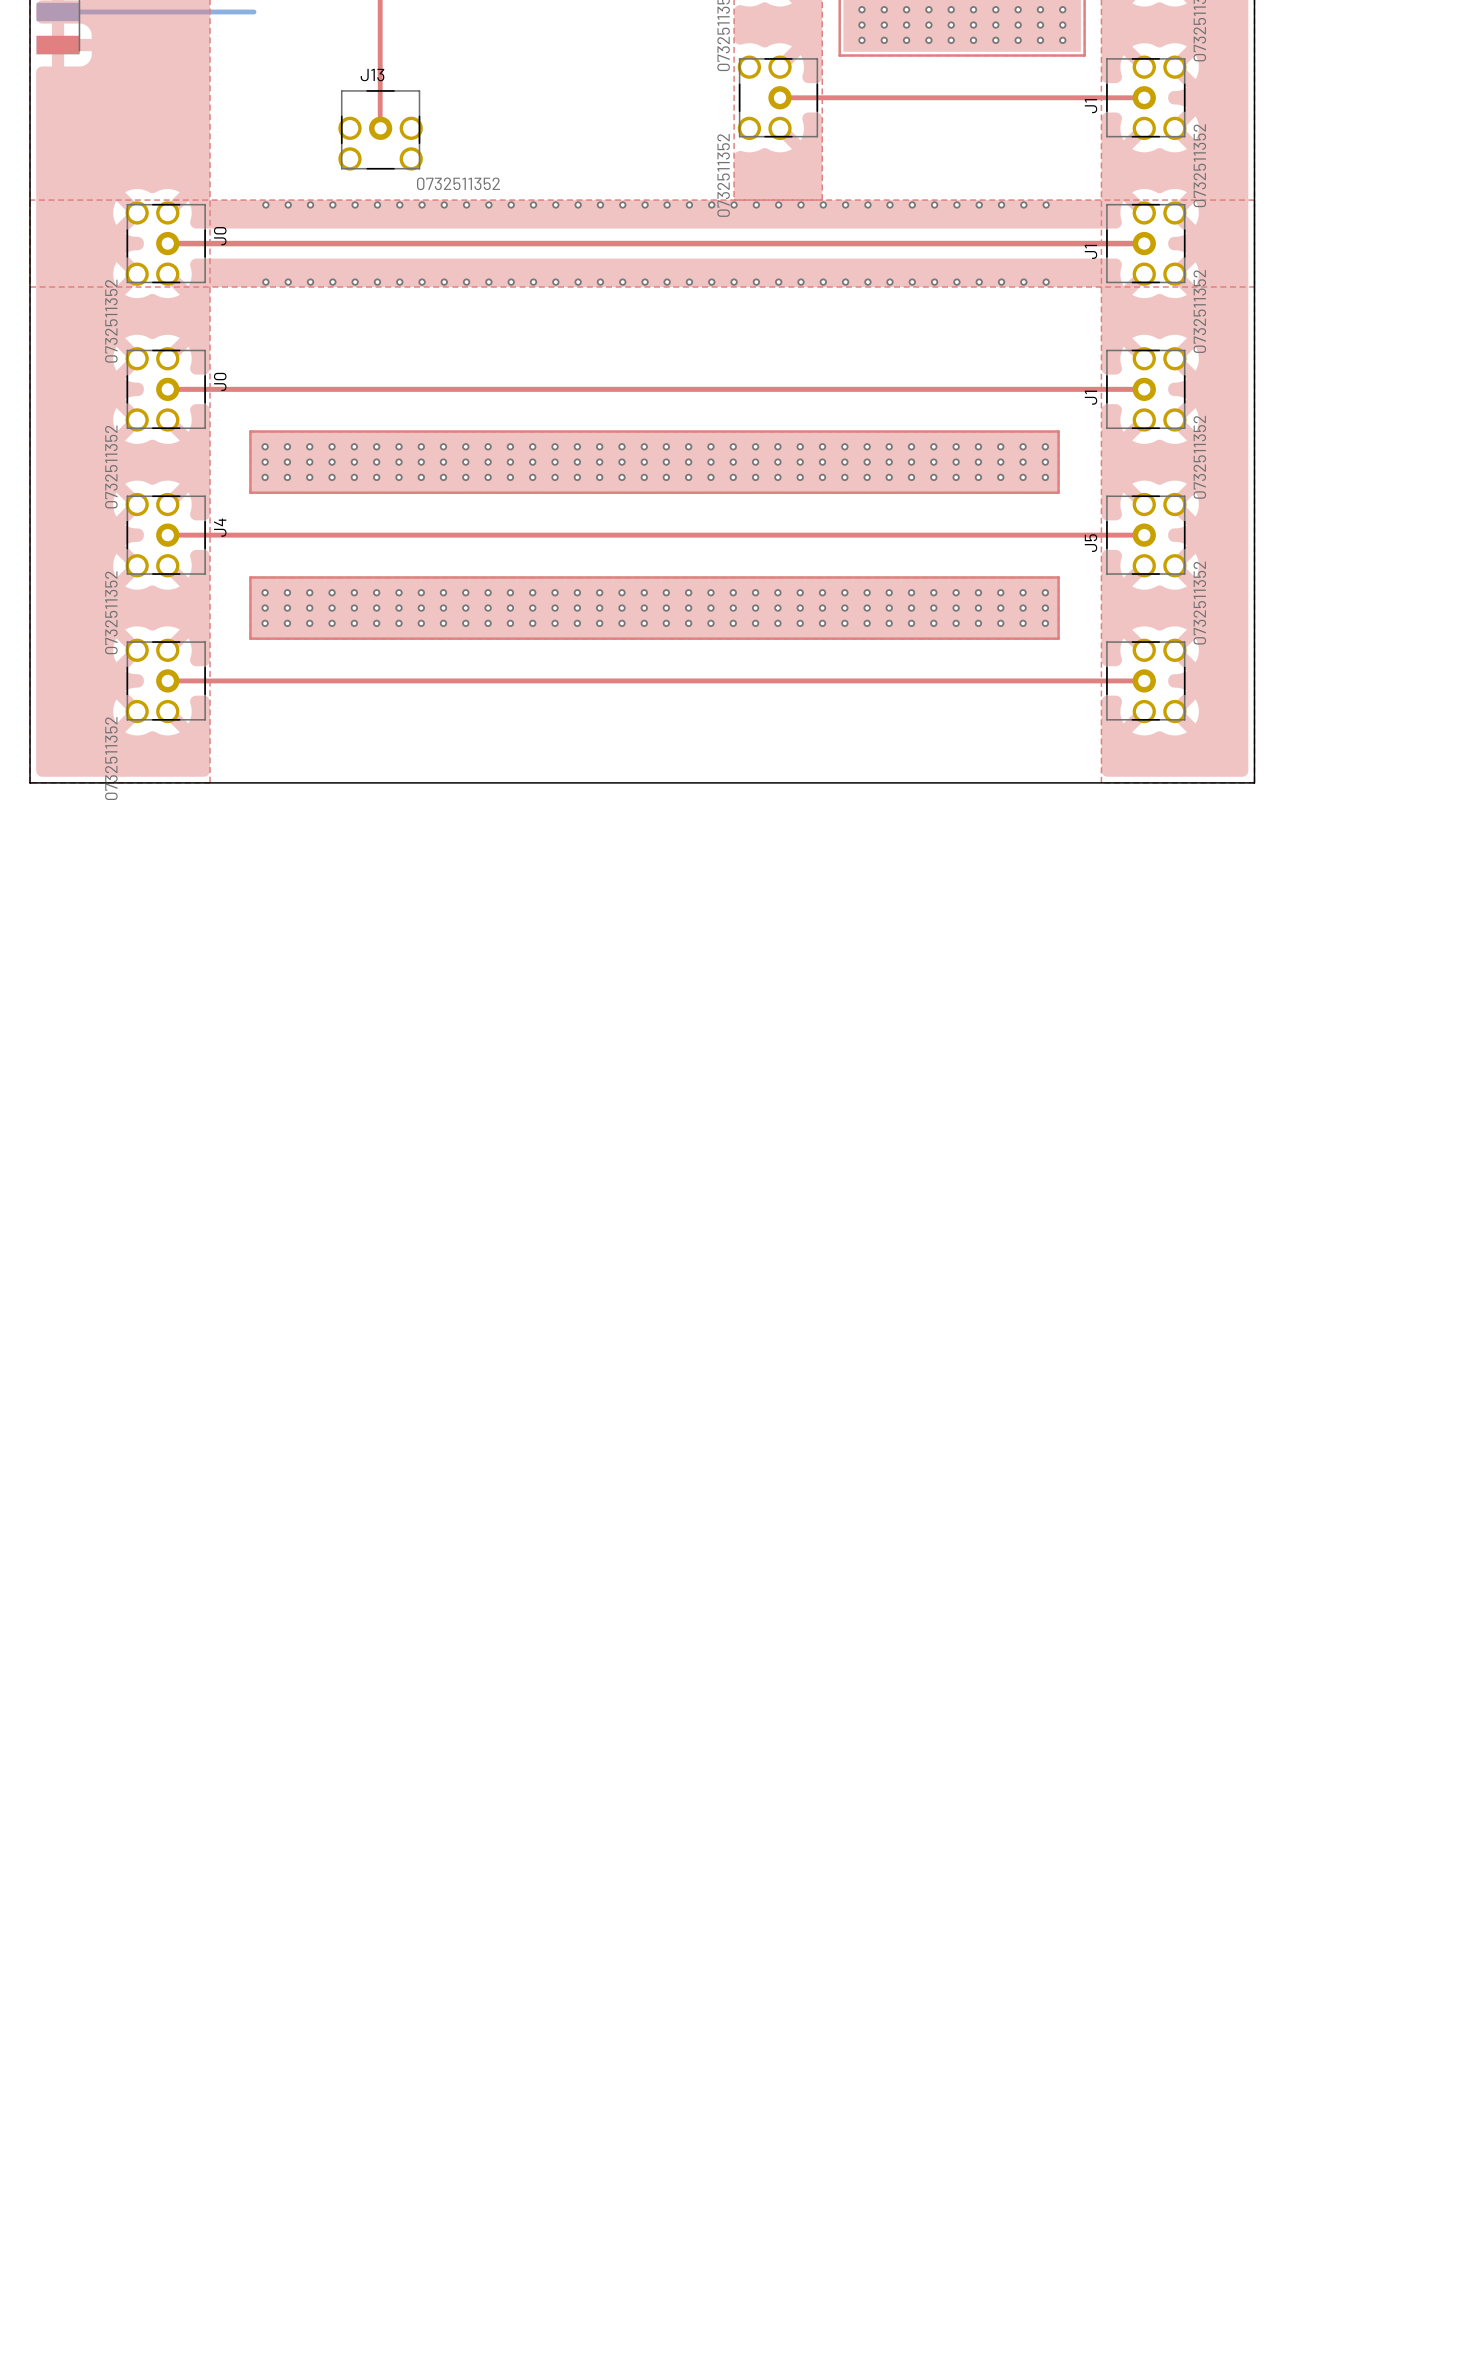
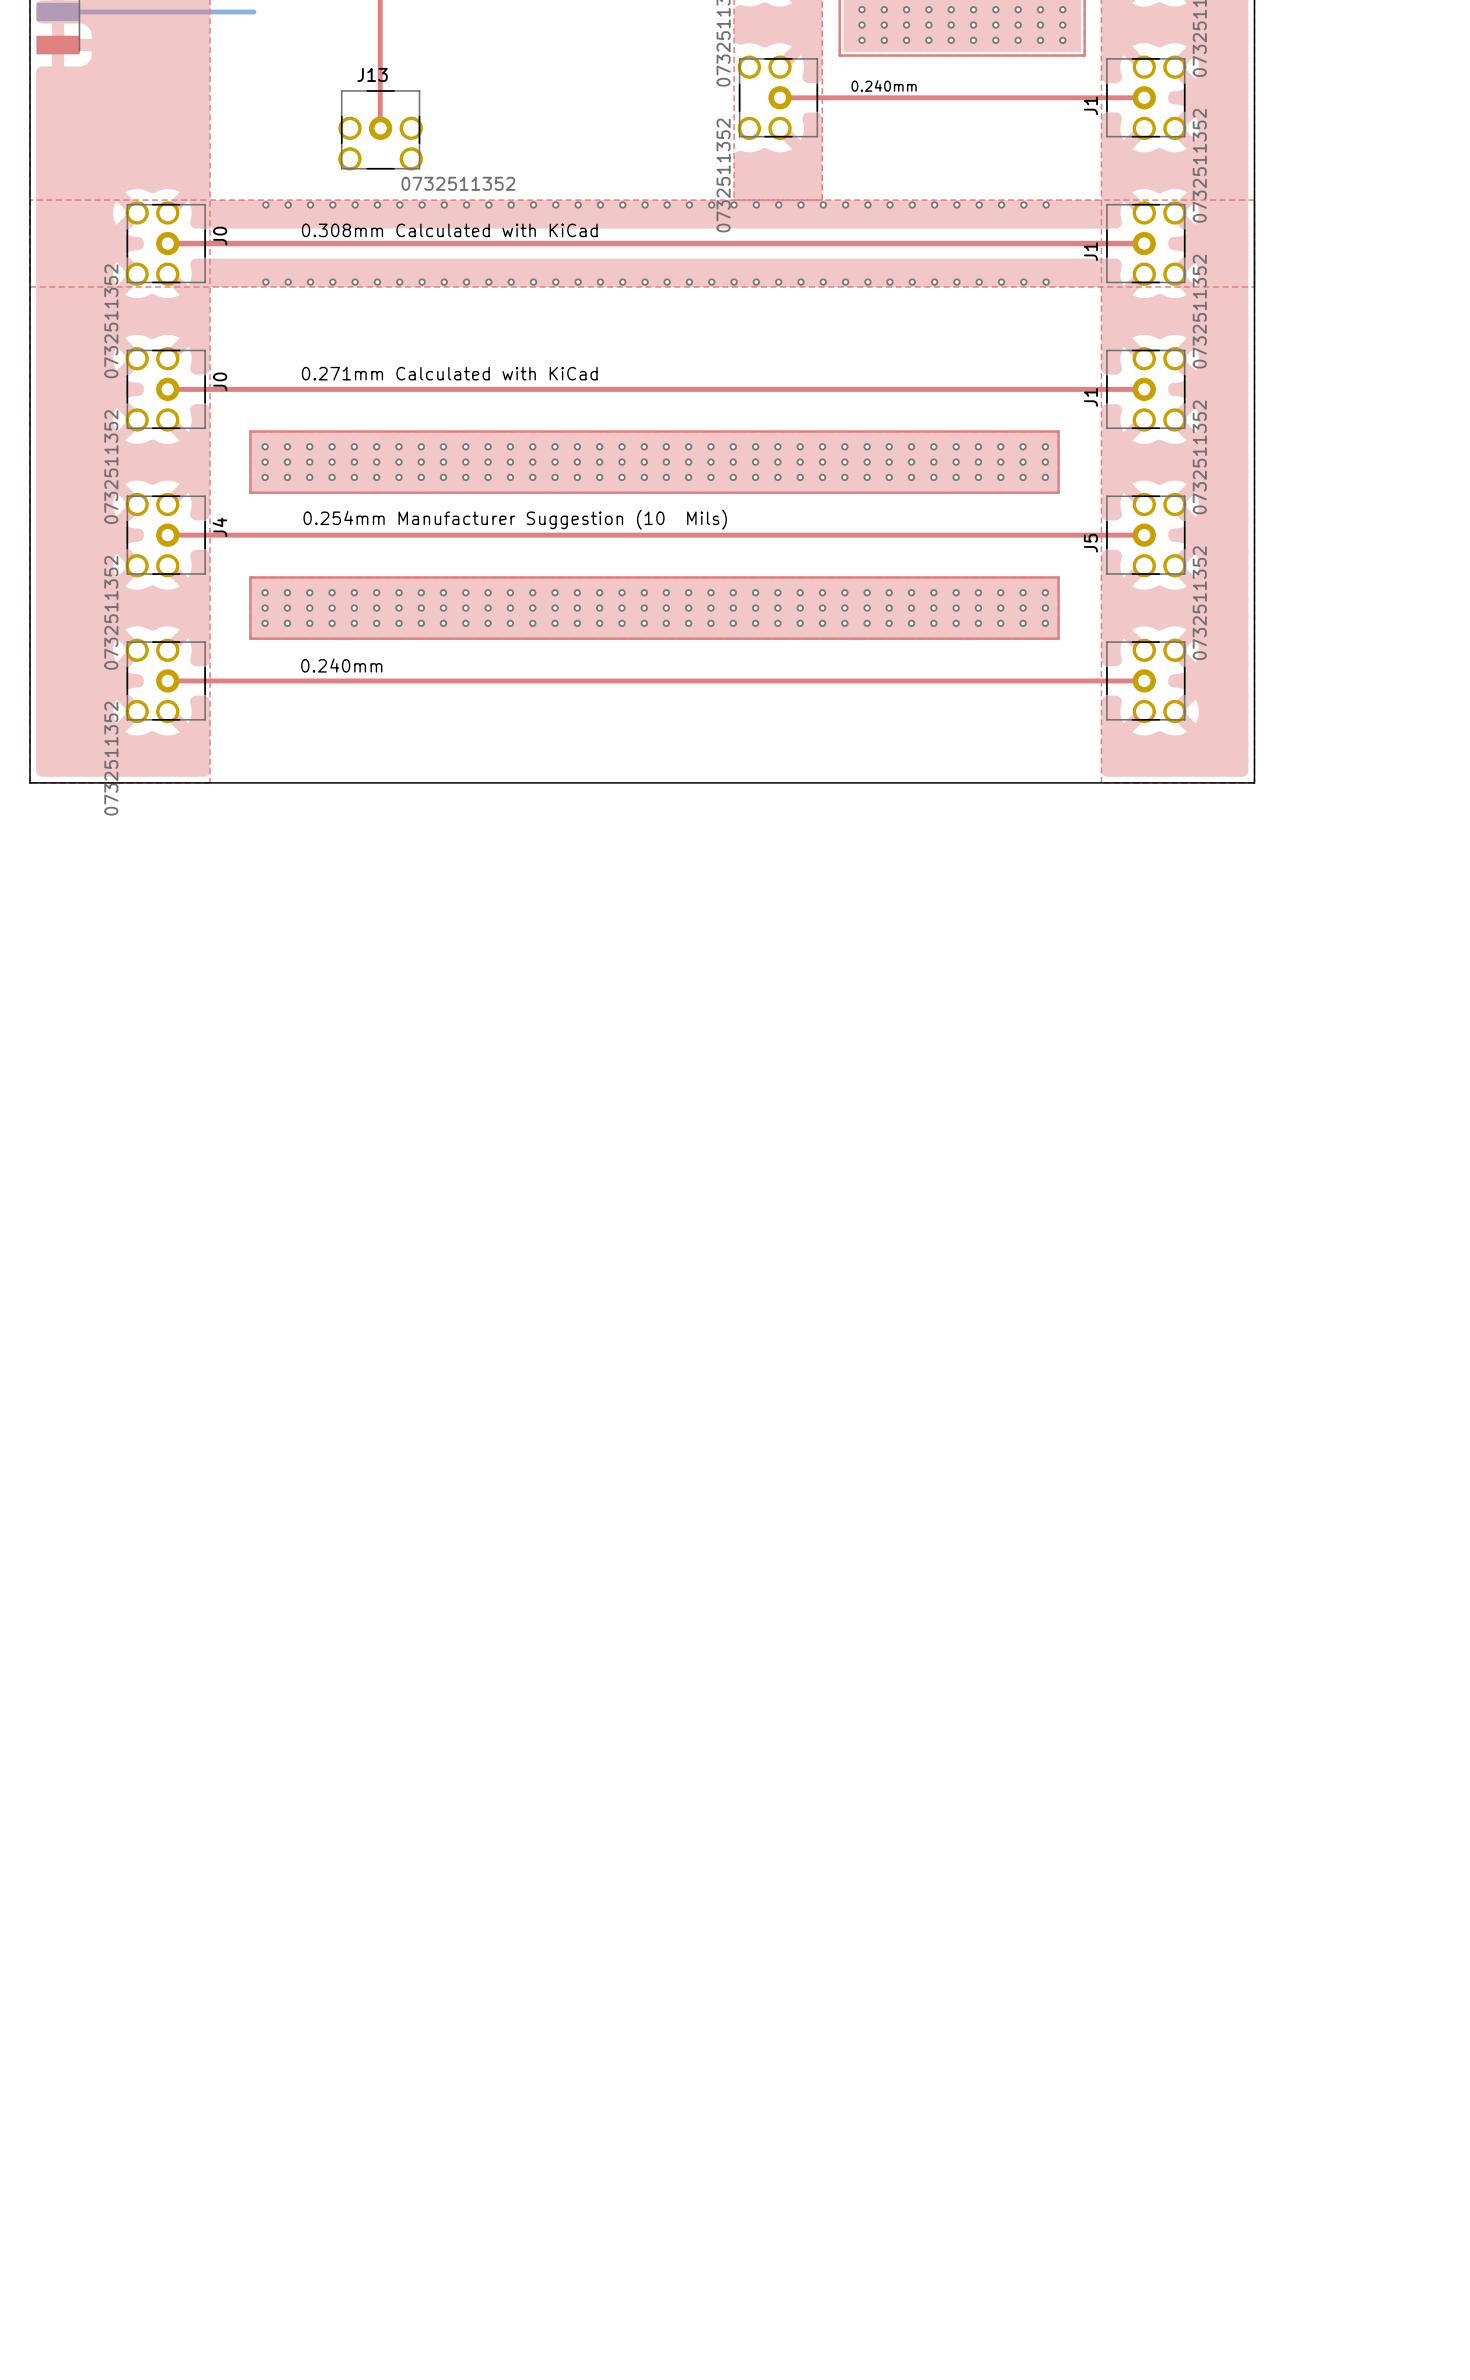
text: none -> 0.240mm (884, 85)
text: none -> 0.308mm Calculated with KiCad (449, 230)
text: none -> 0.271mm Calculated with KiCad (449, 373)
text: none -> 0.254mm Manufacturer Suggestion (10 Mils) (515, 519)
text: none -> 0.240mm (341, 665)

